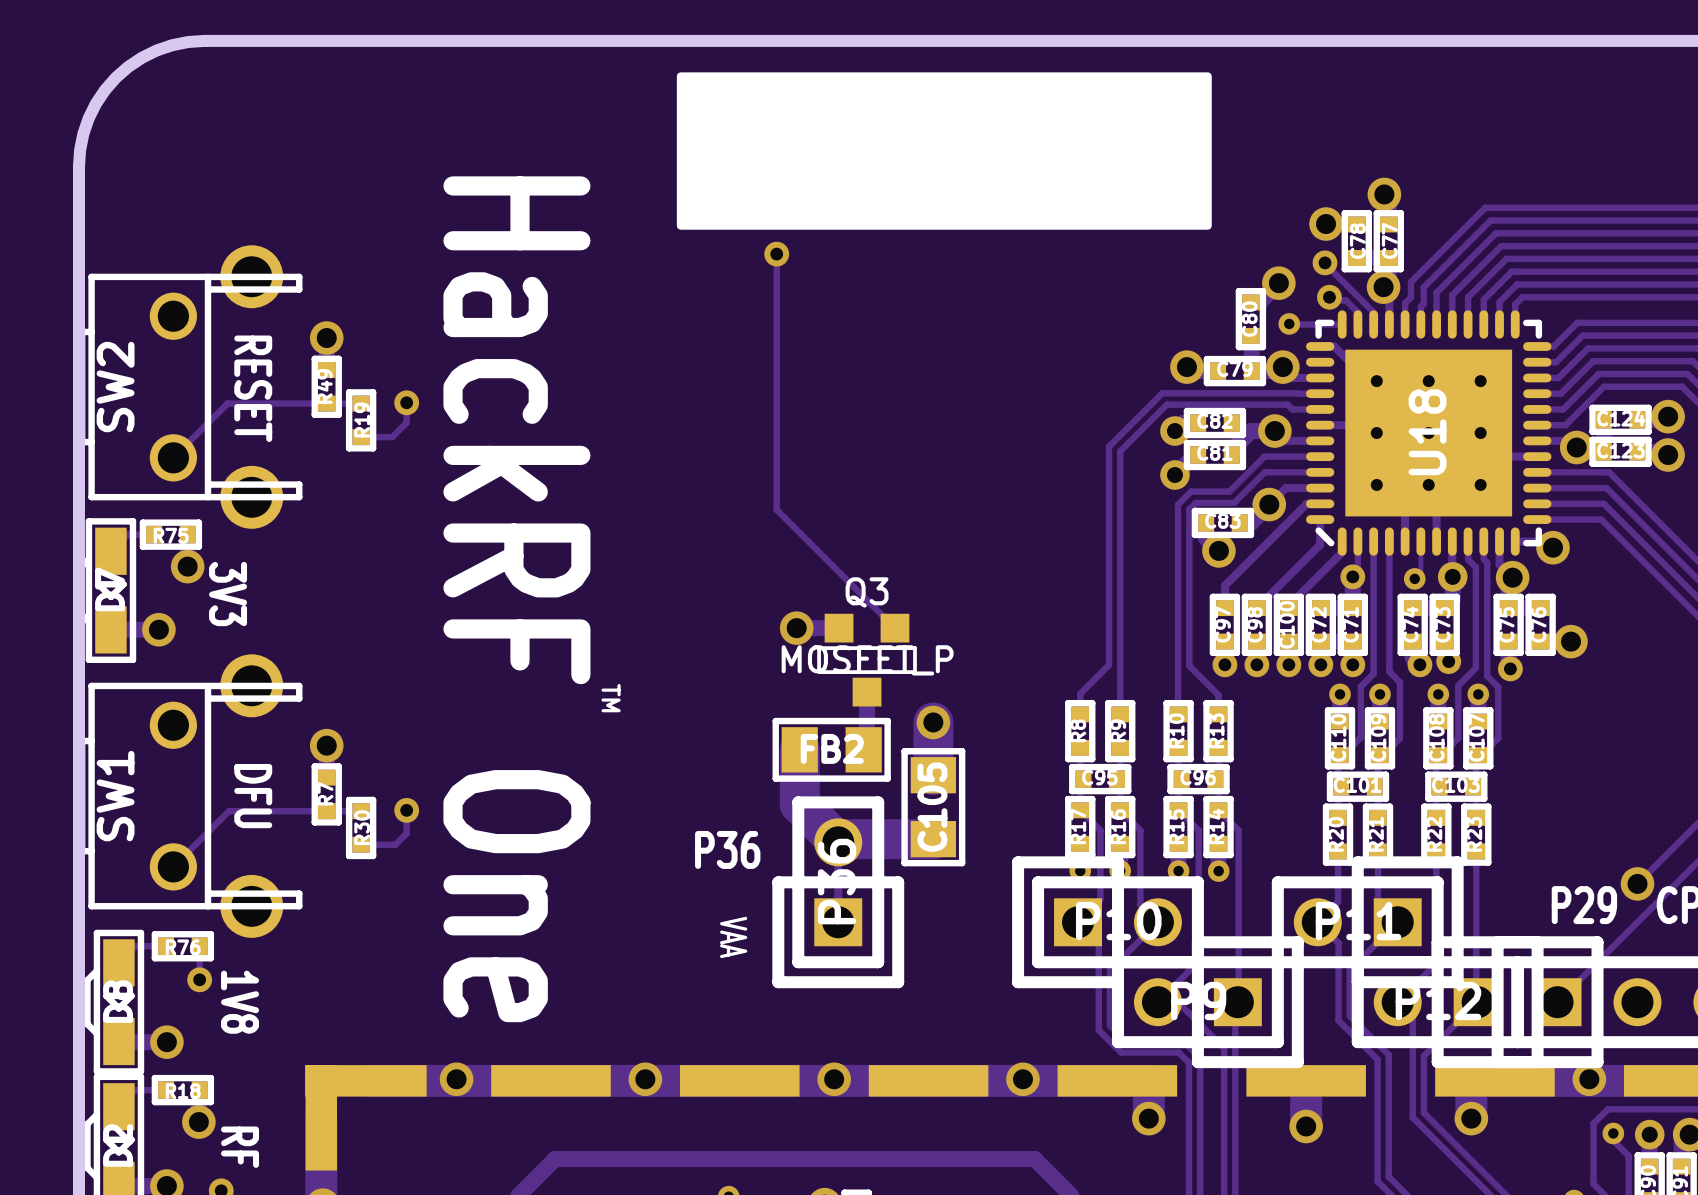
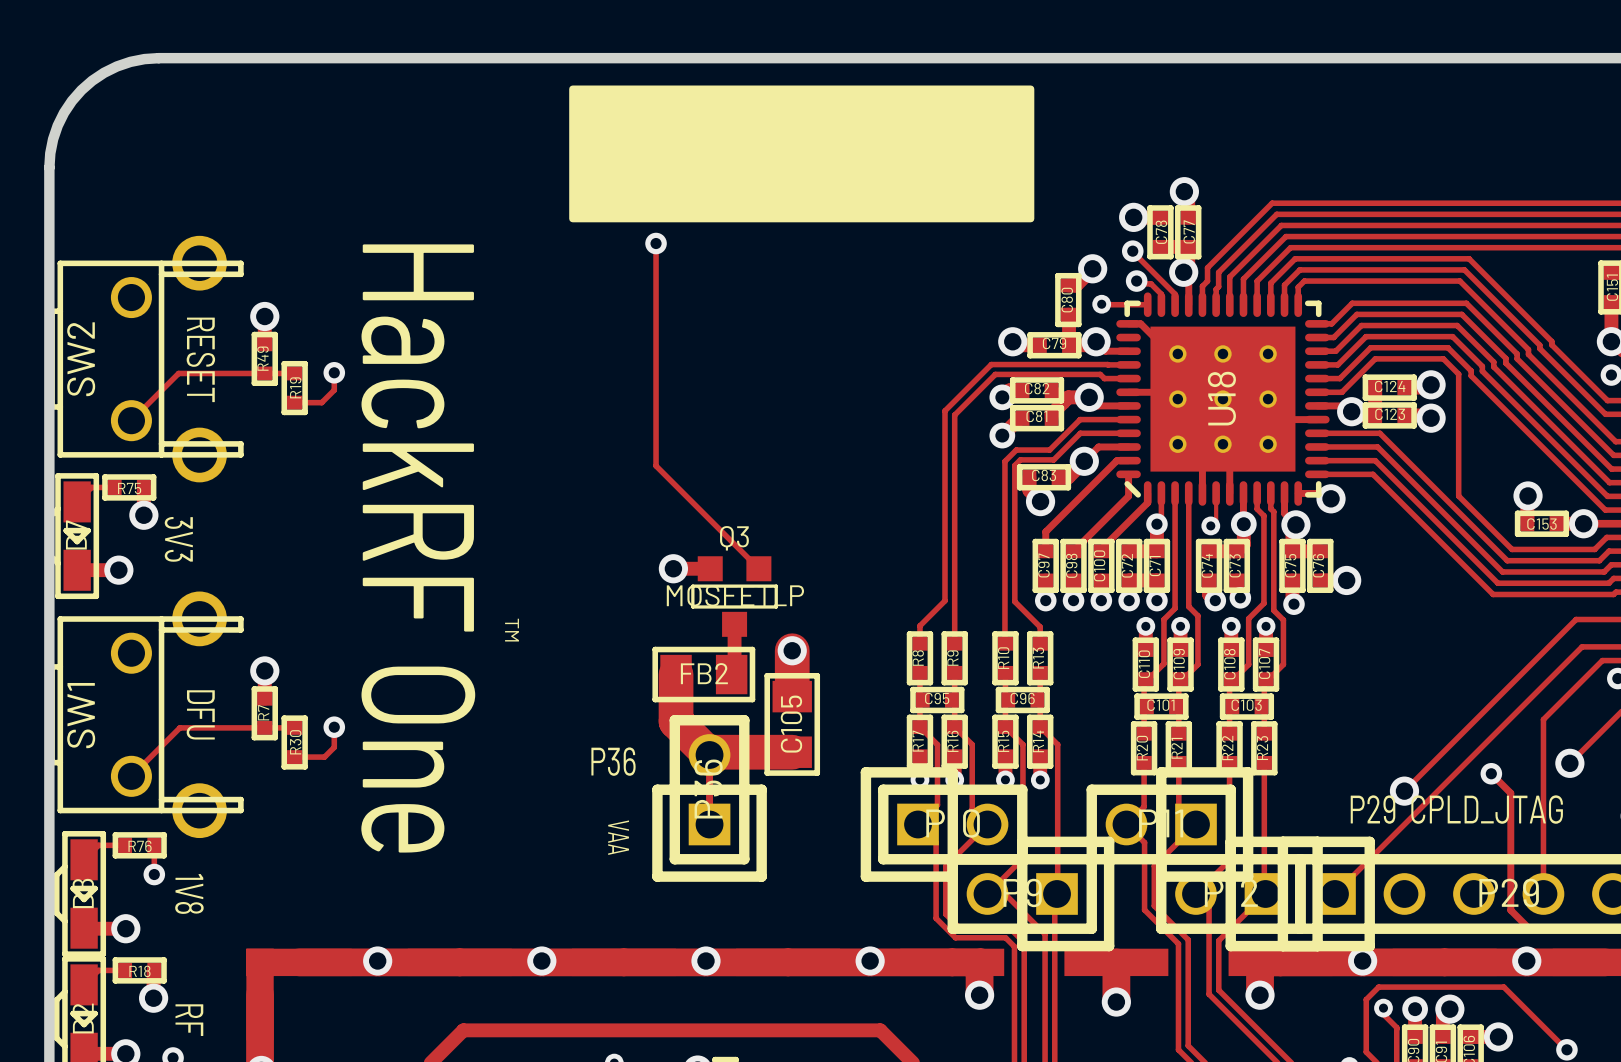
text position: HackRF One (516, 599) -> HackRF One (418, 548)

